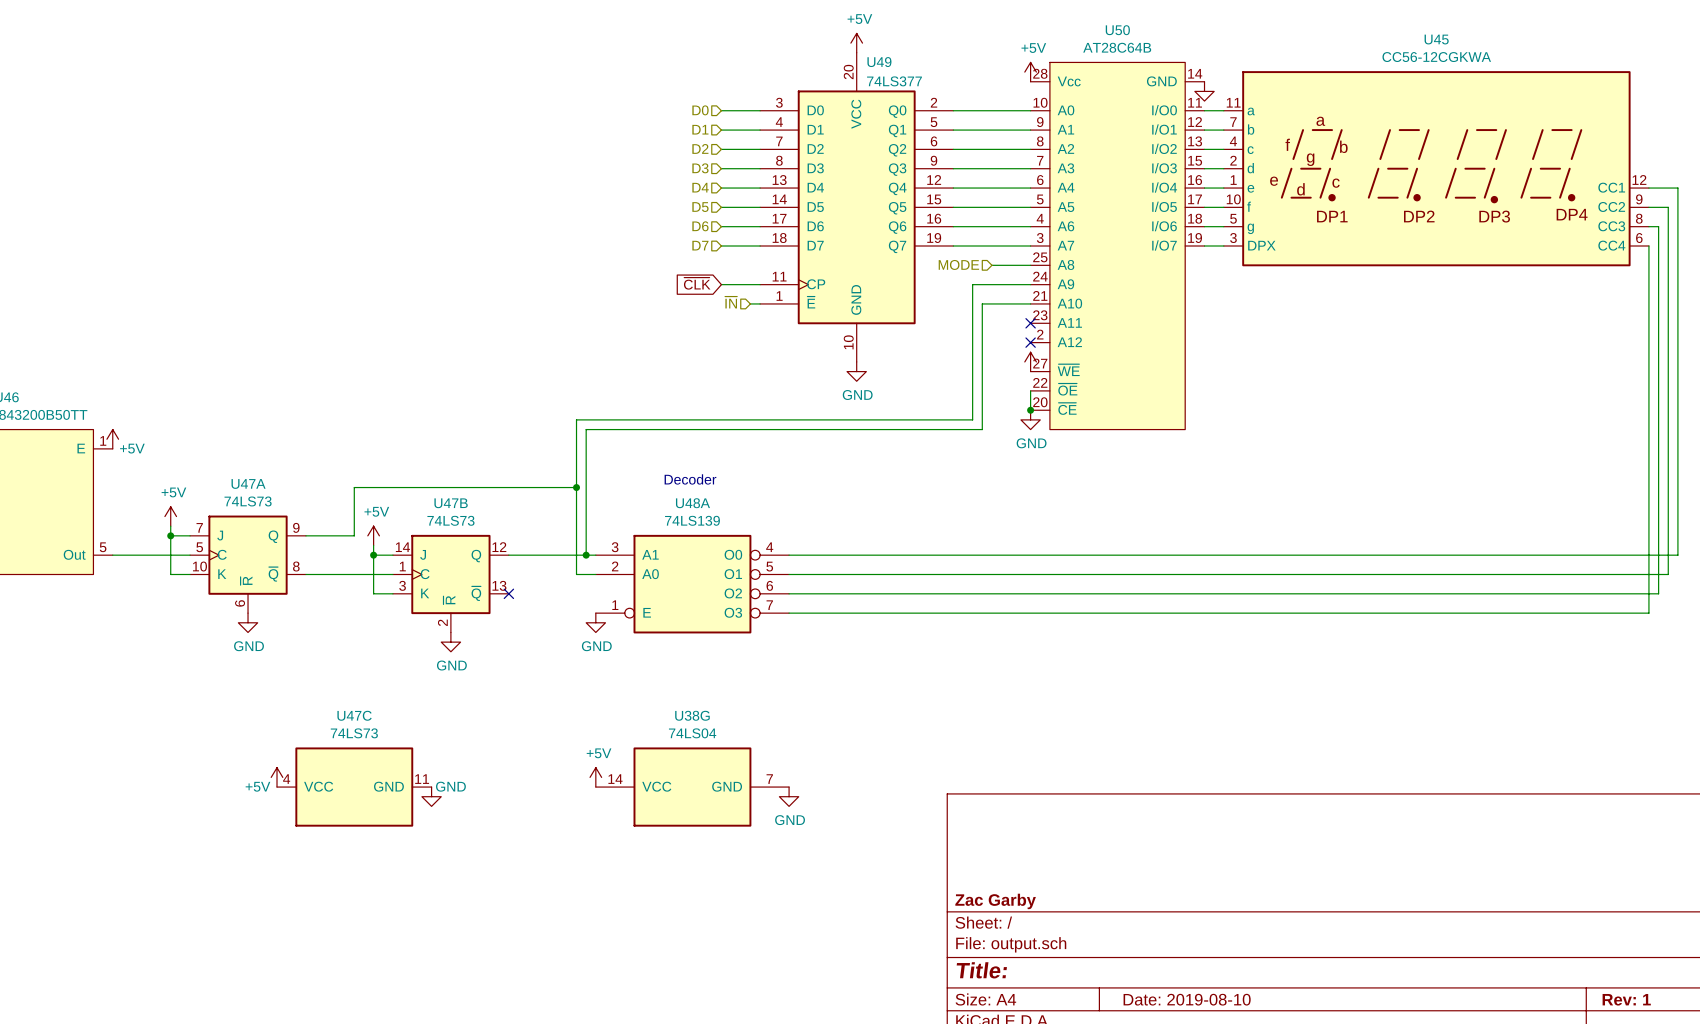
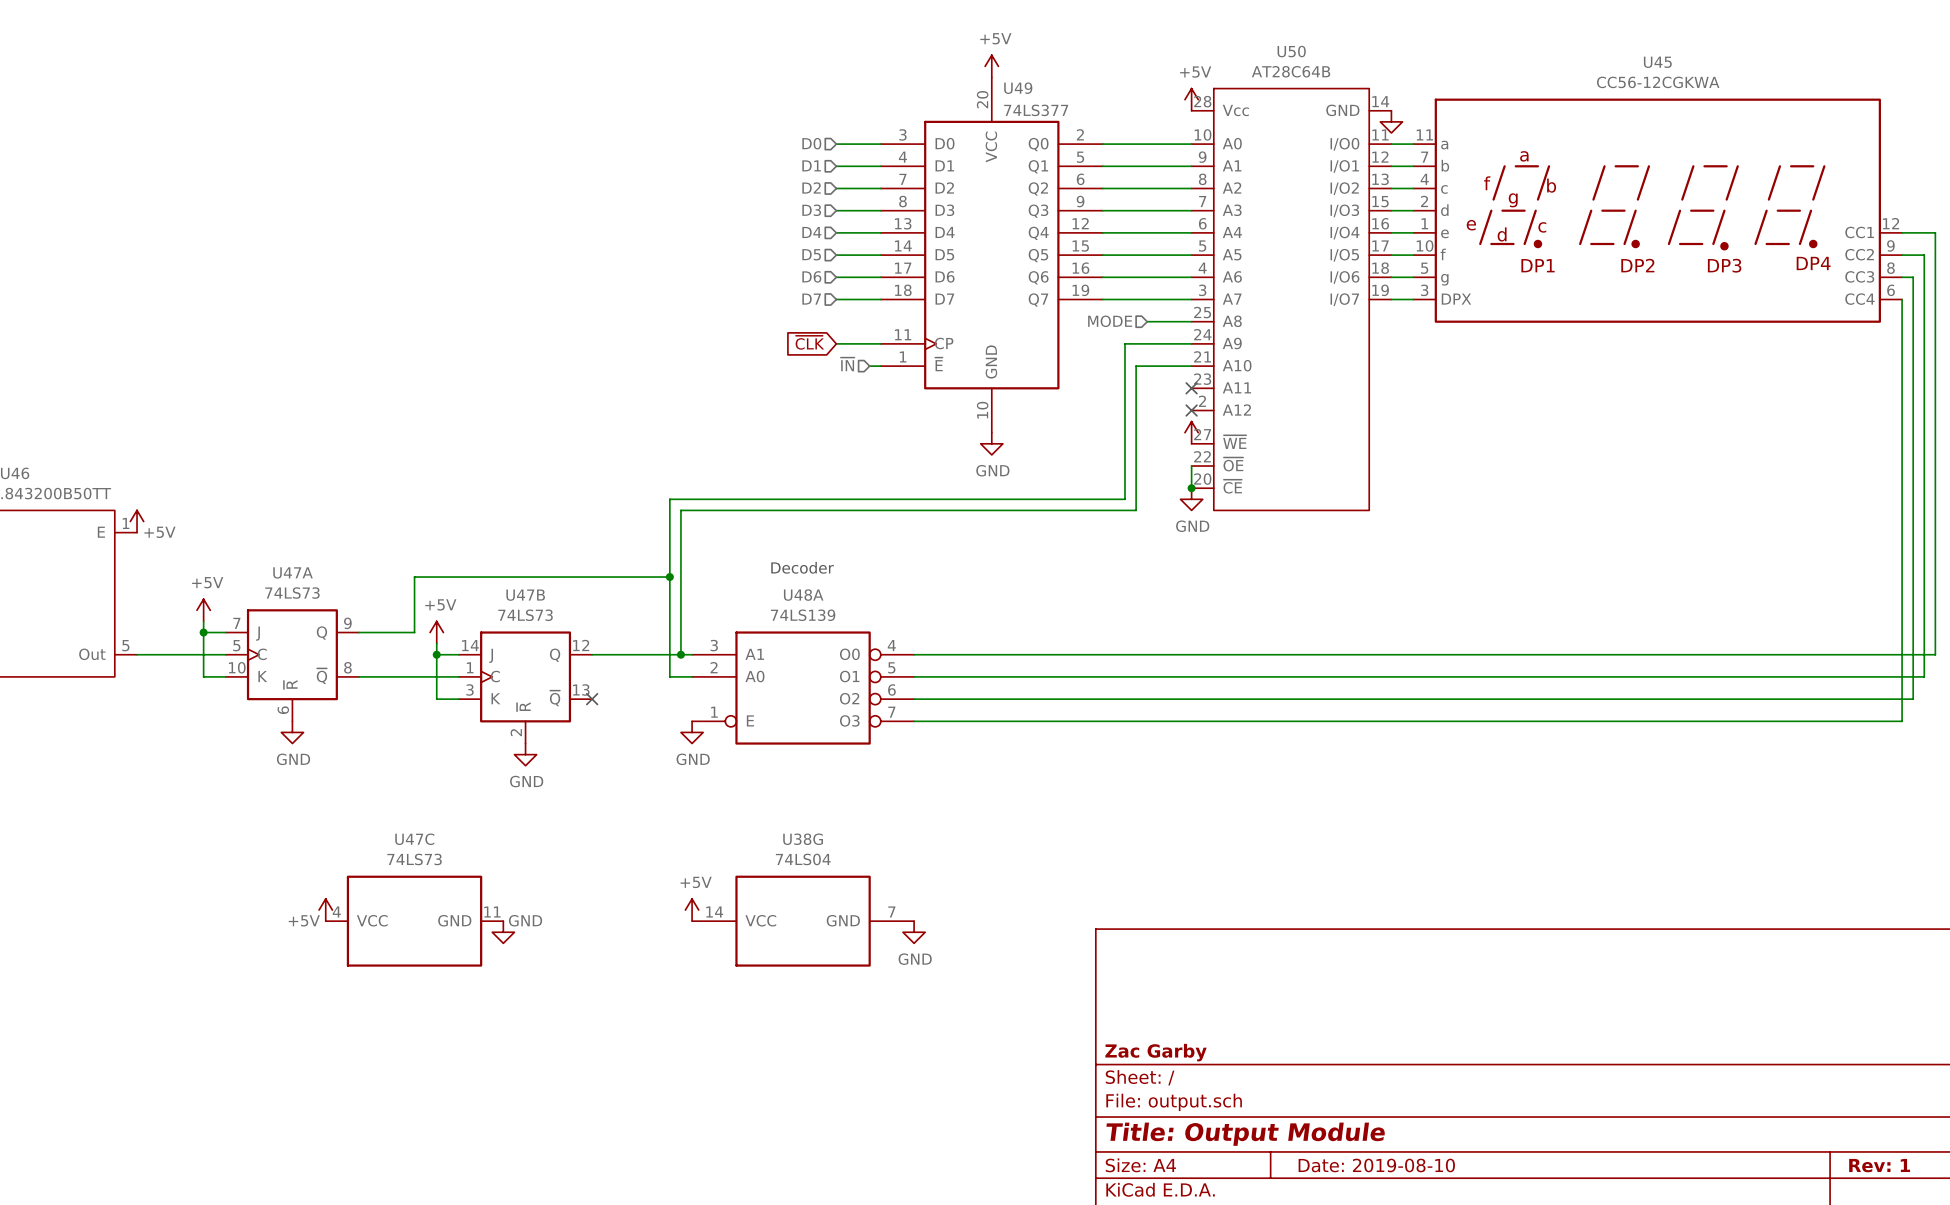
title block: Title: (981, 970) -> Title: Output Module (1245, 1134)

